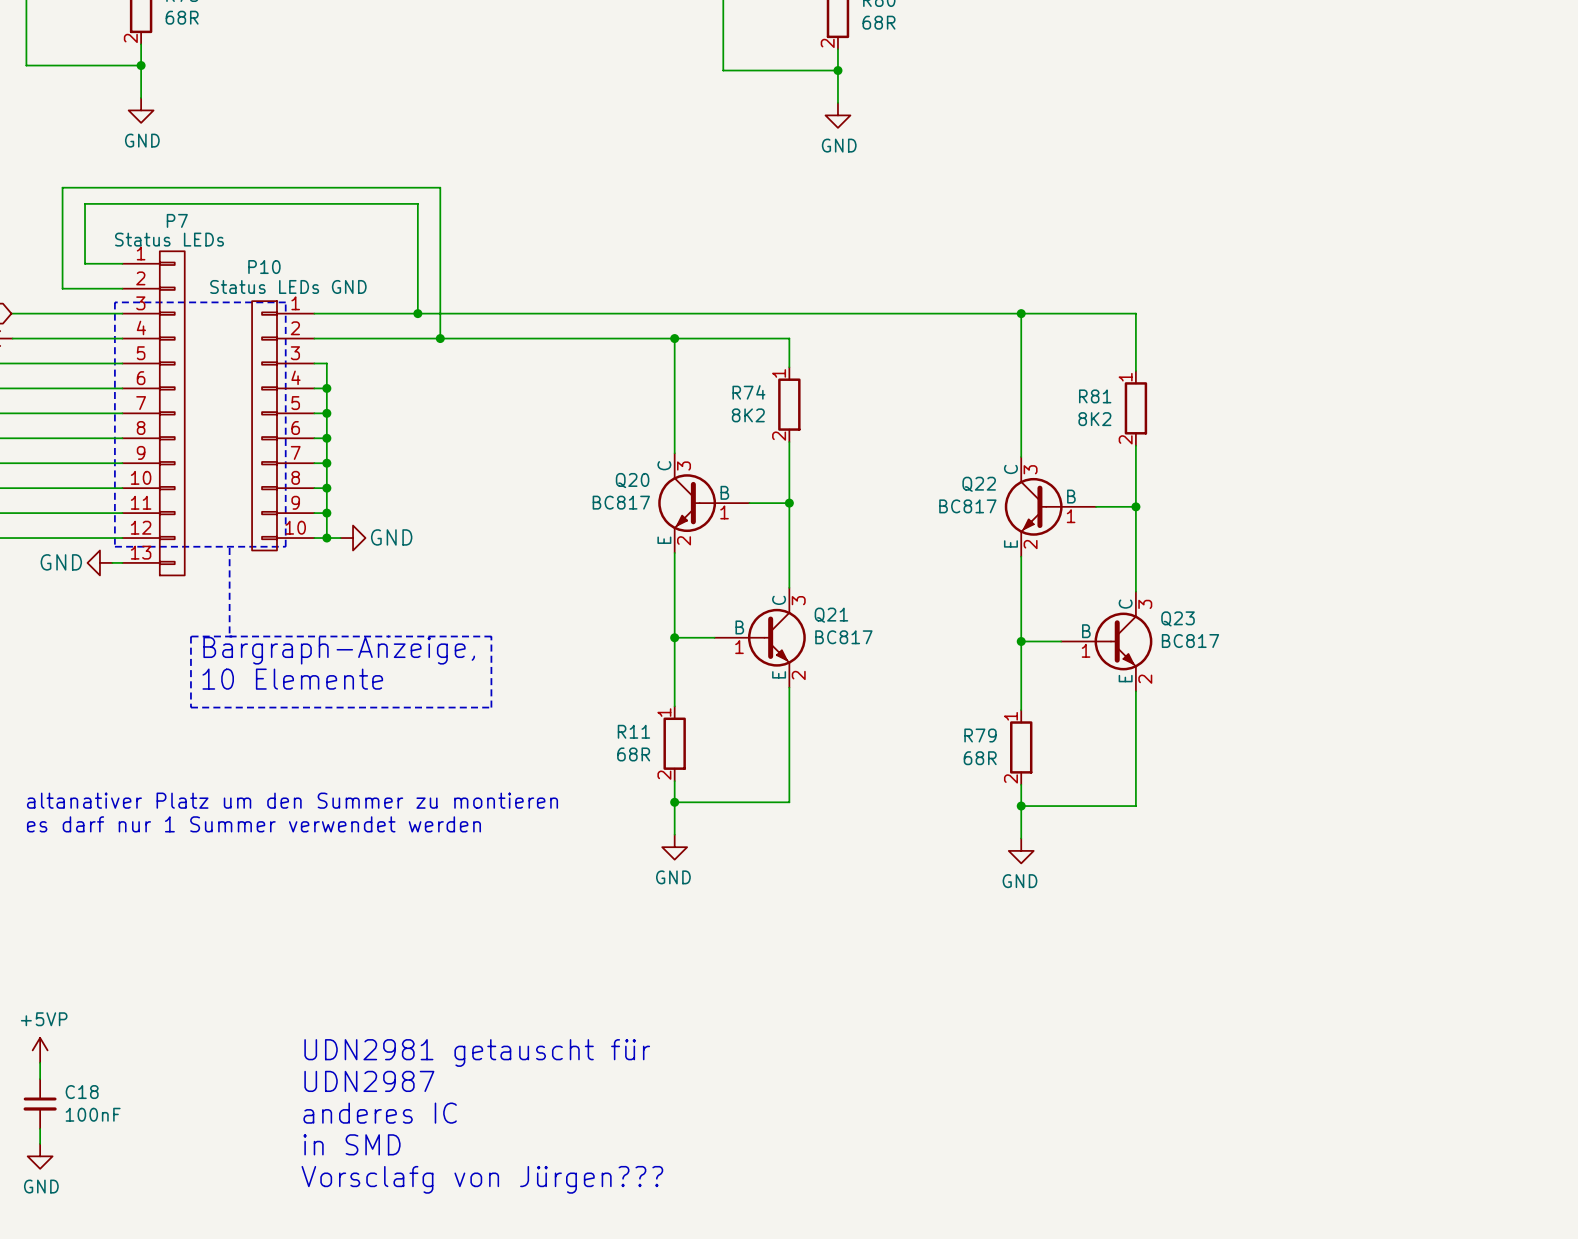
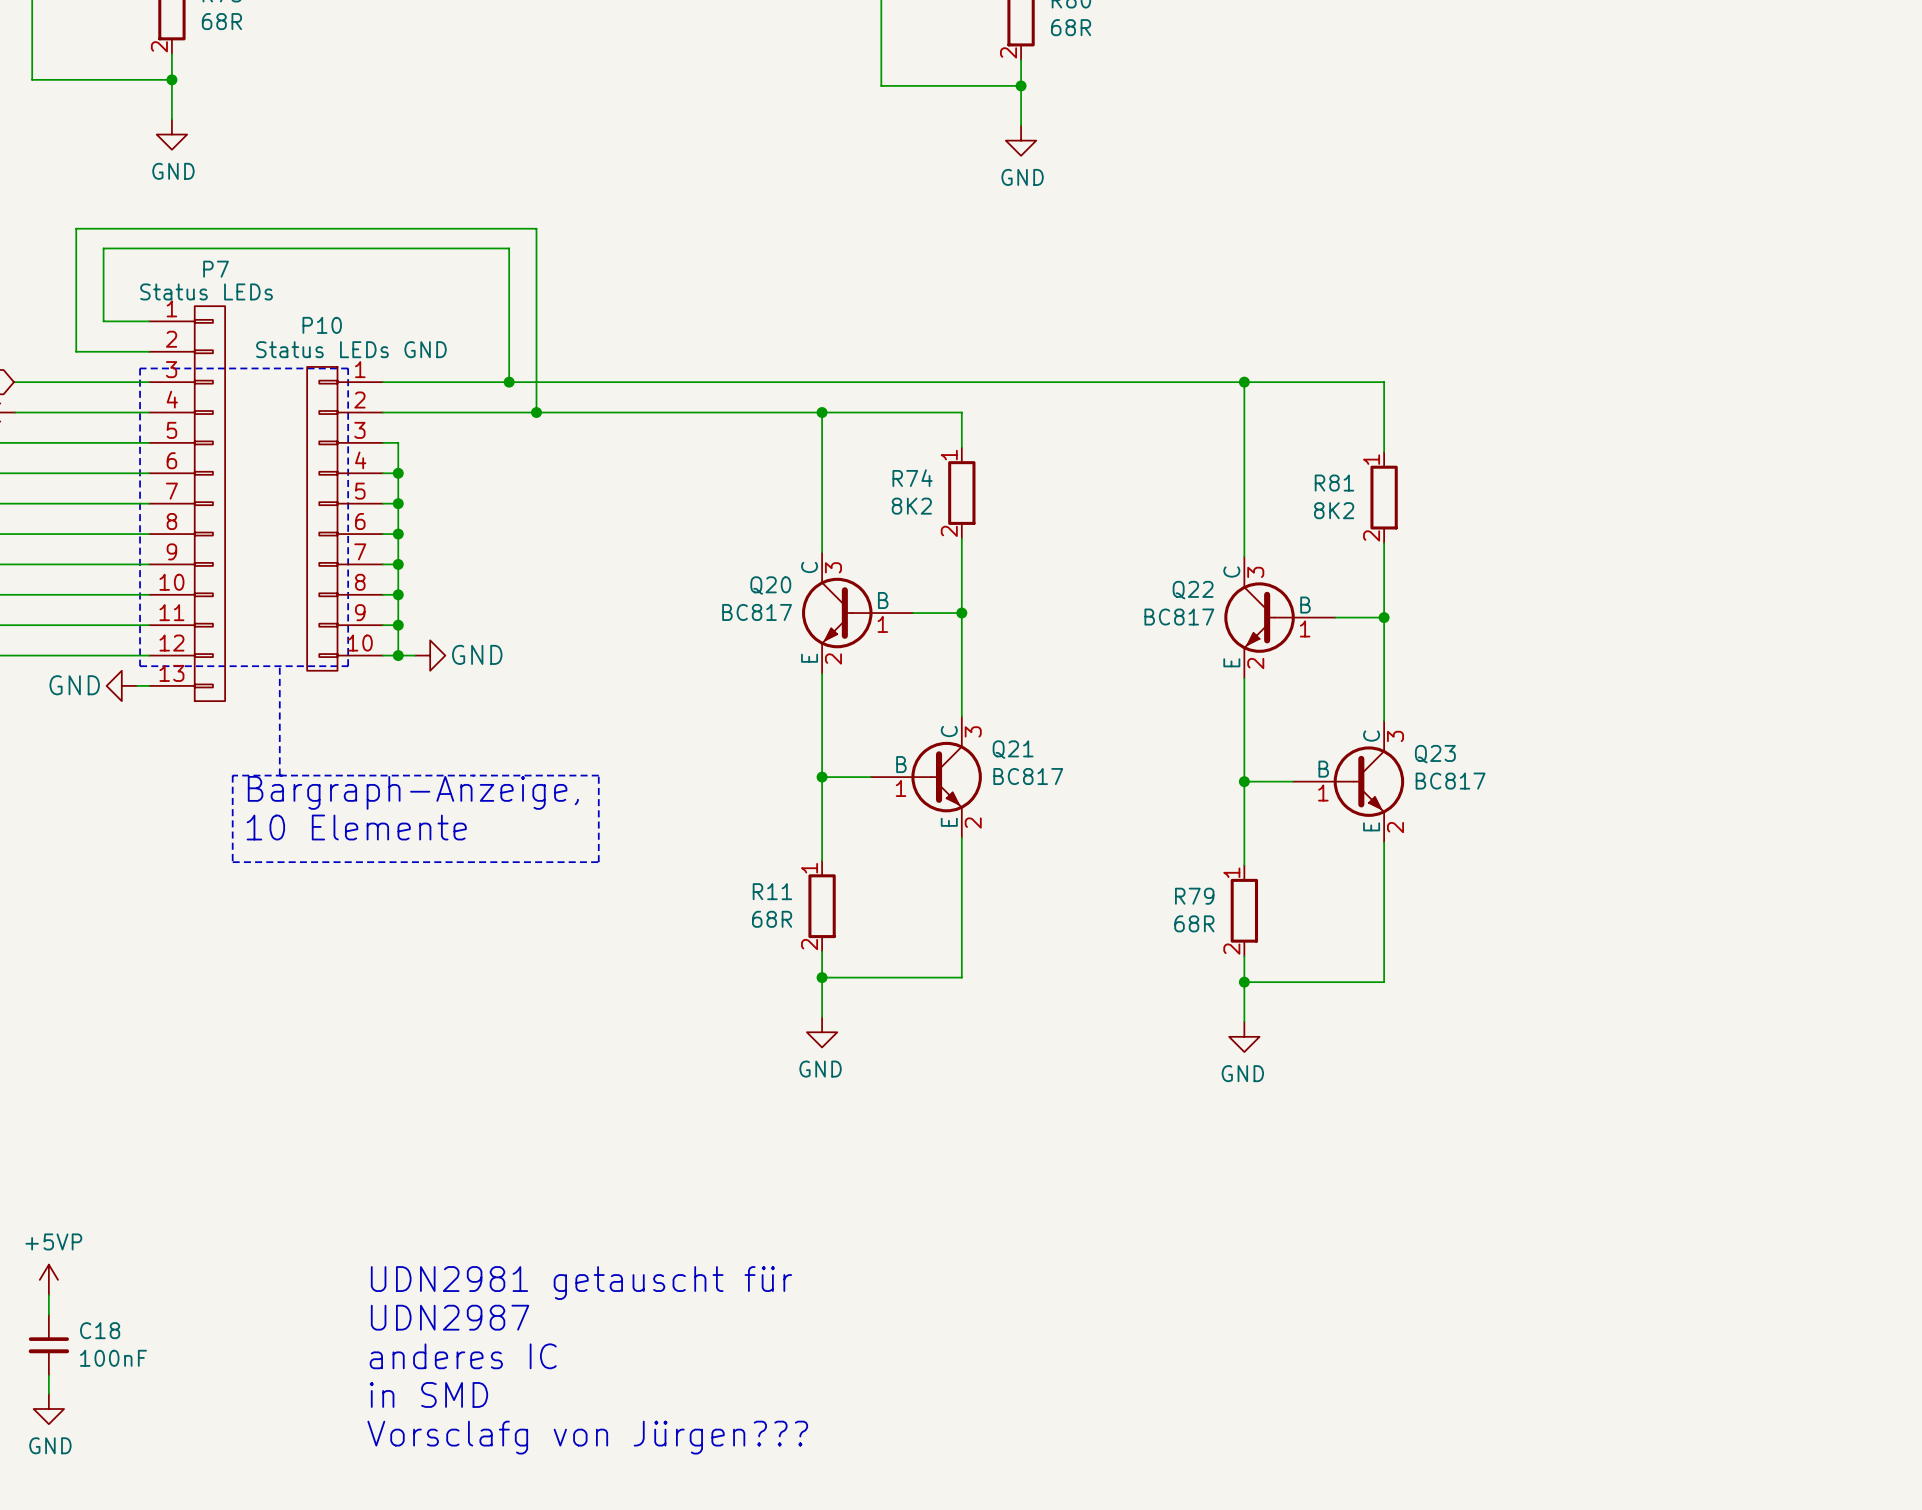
text: altanativer Platz um den Summer zu montieren (292, 800) -> none
text: es darf nur 1 Summer verwendet werden (253, 824) -> none

